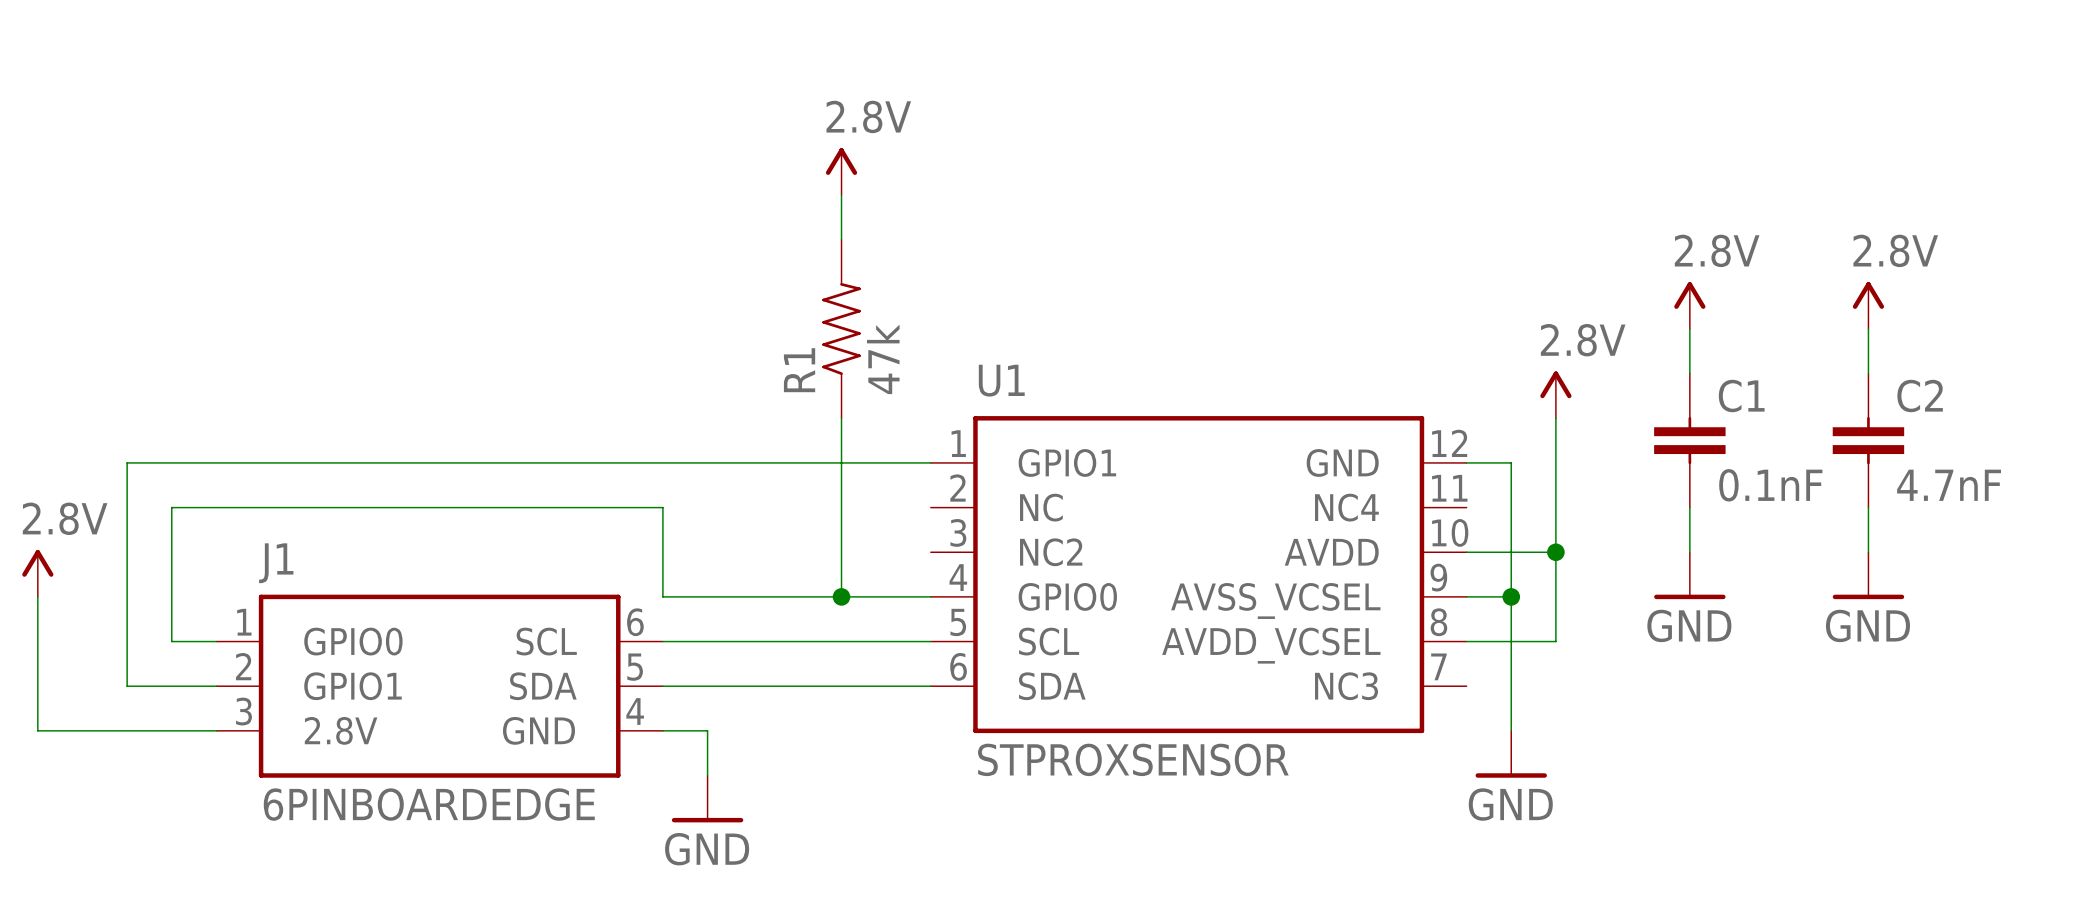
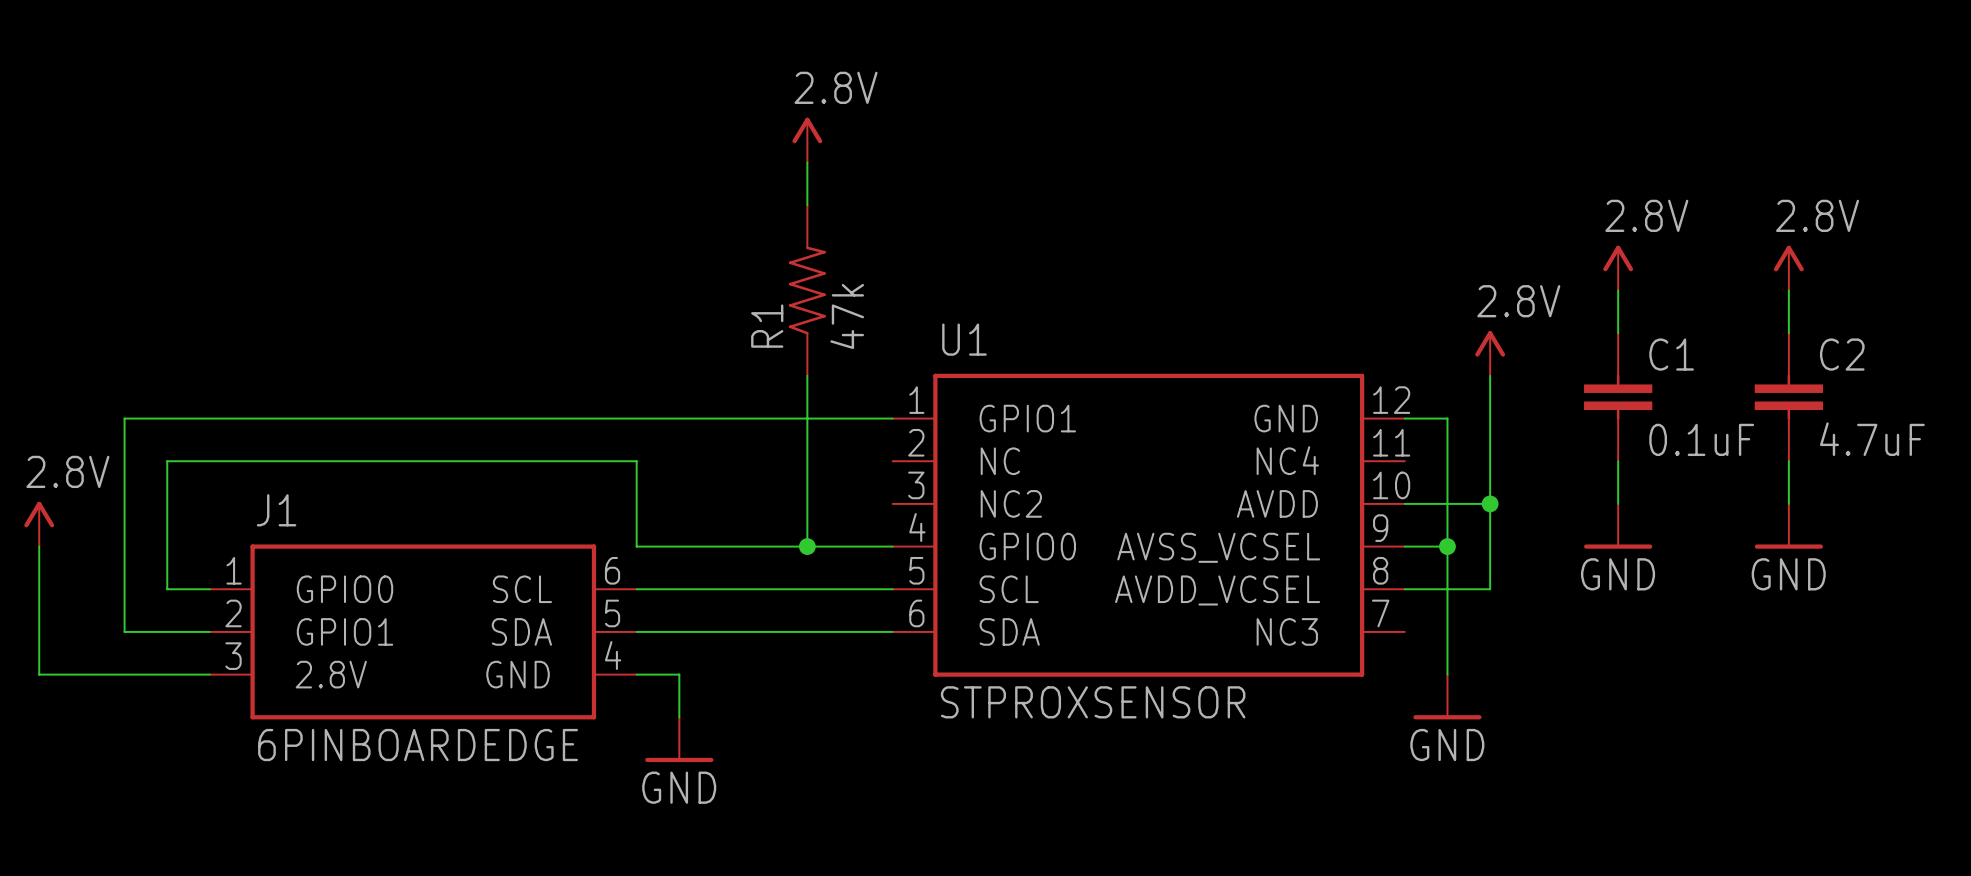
C1 value: 0.1nF (1770, 485) -> 0.1uF (1701, 439)
C2 value: 4.7nF (1949, 485) -> 4.7uF (1872, 439)

